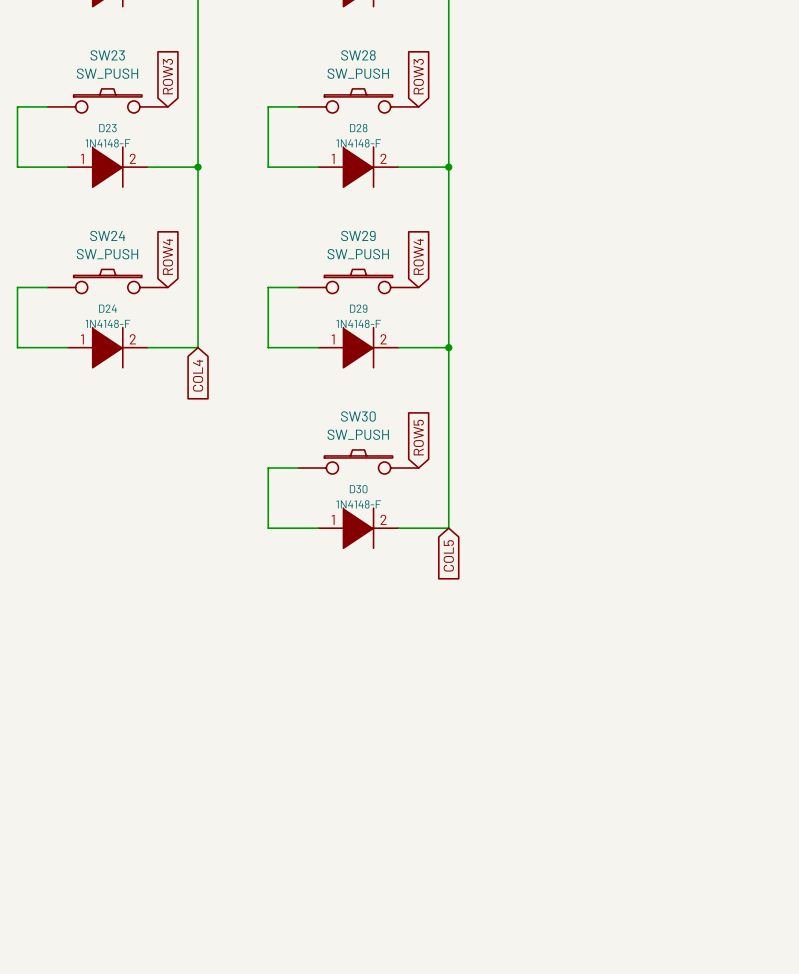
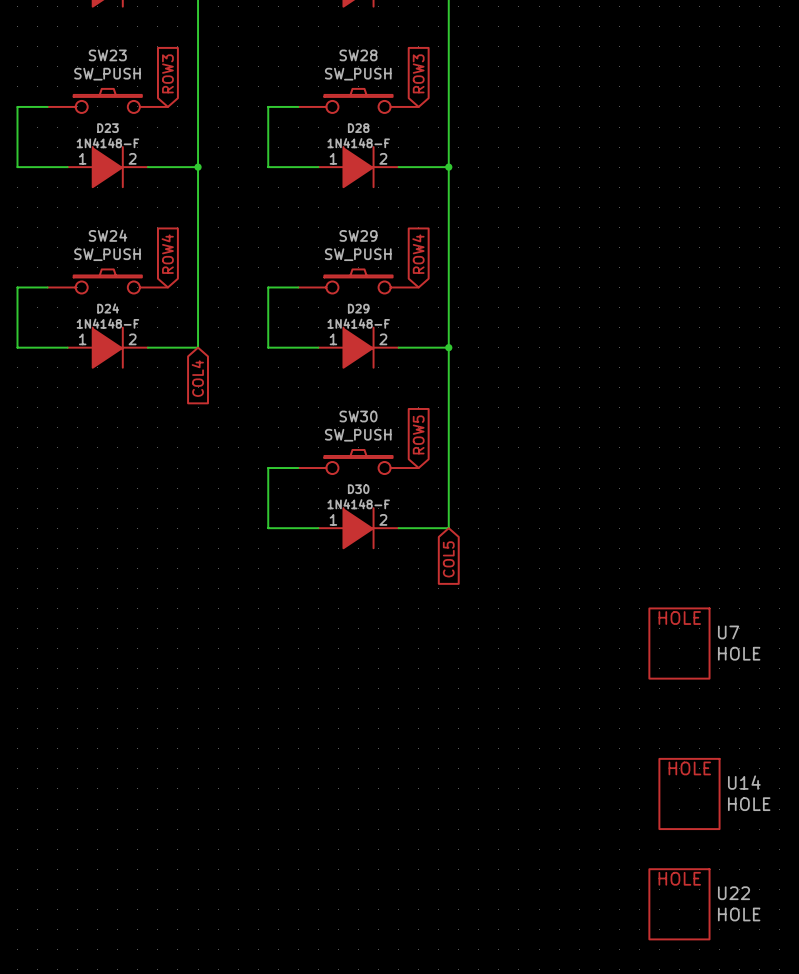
U7: none -> HOLE (679, 643)
U14: none -> HOLE (689, 793)
U22: none -> HOLE (679, 904)

